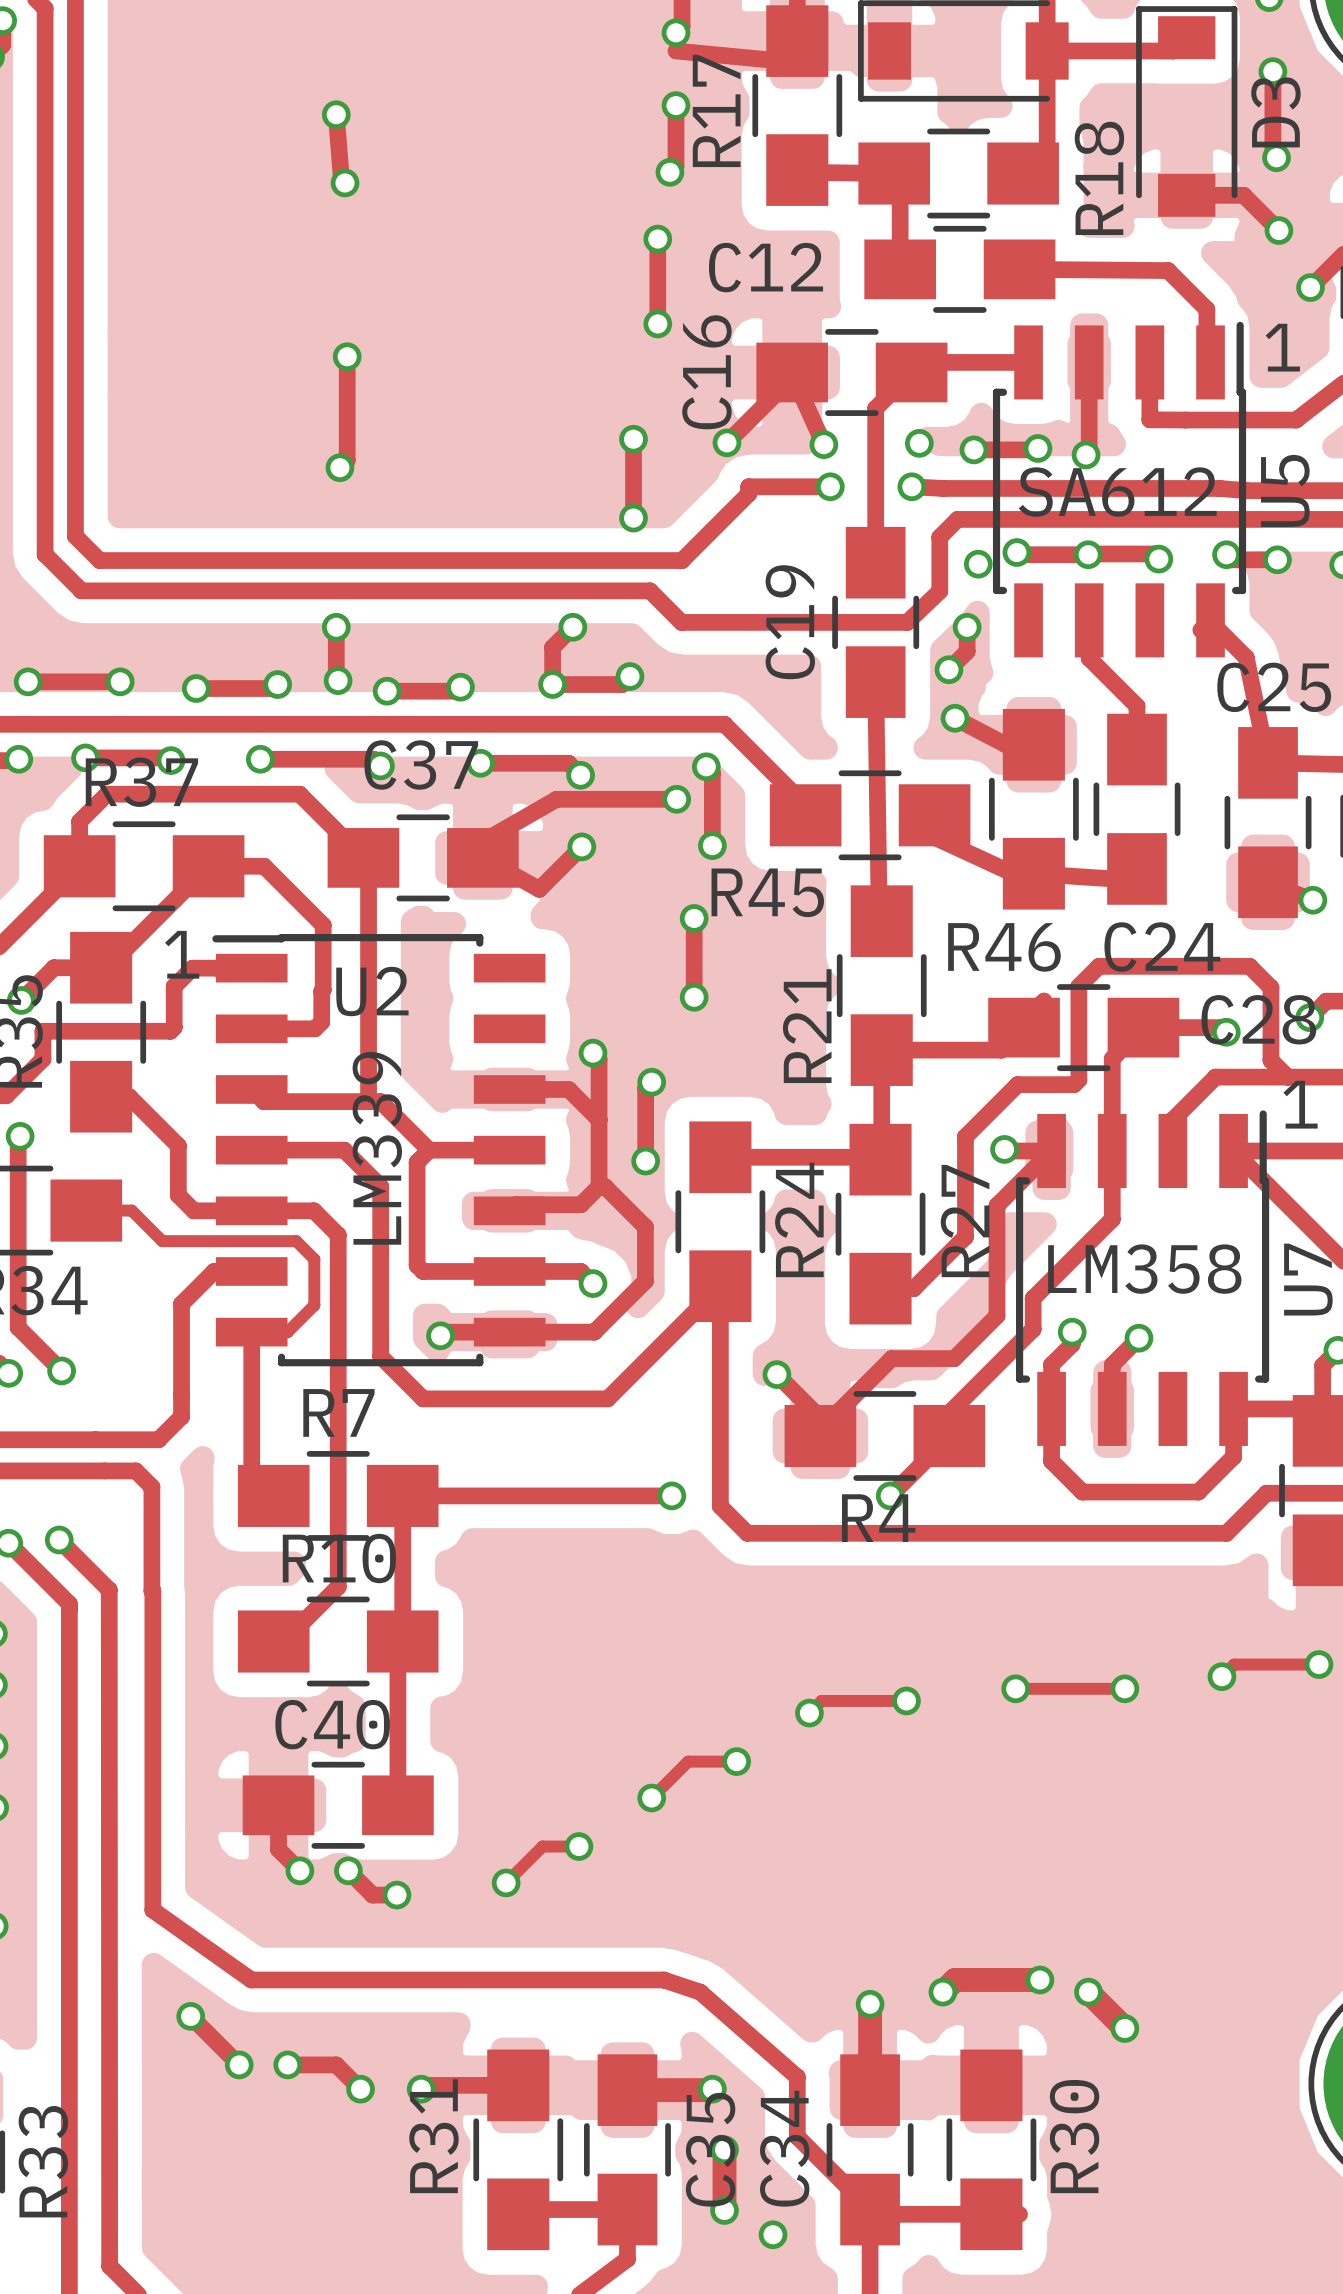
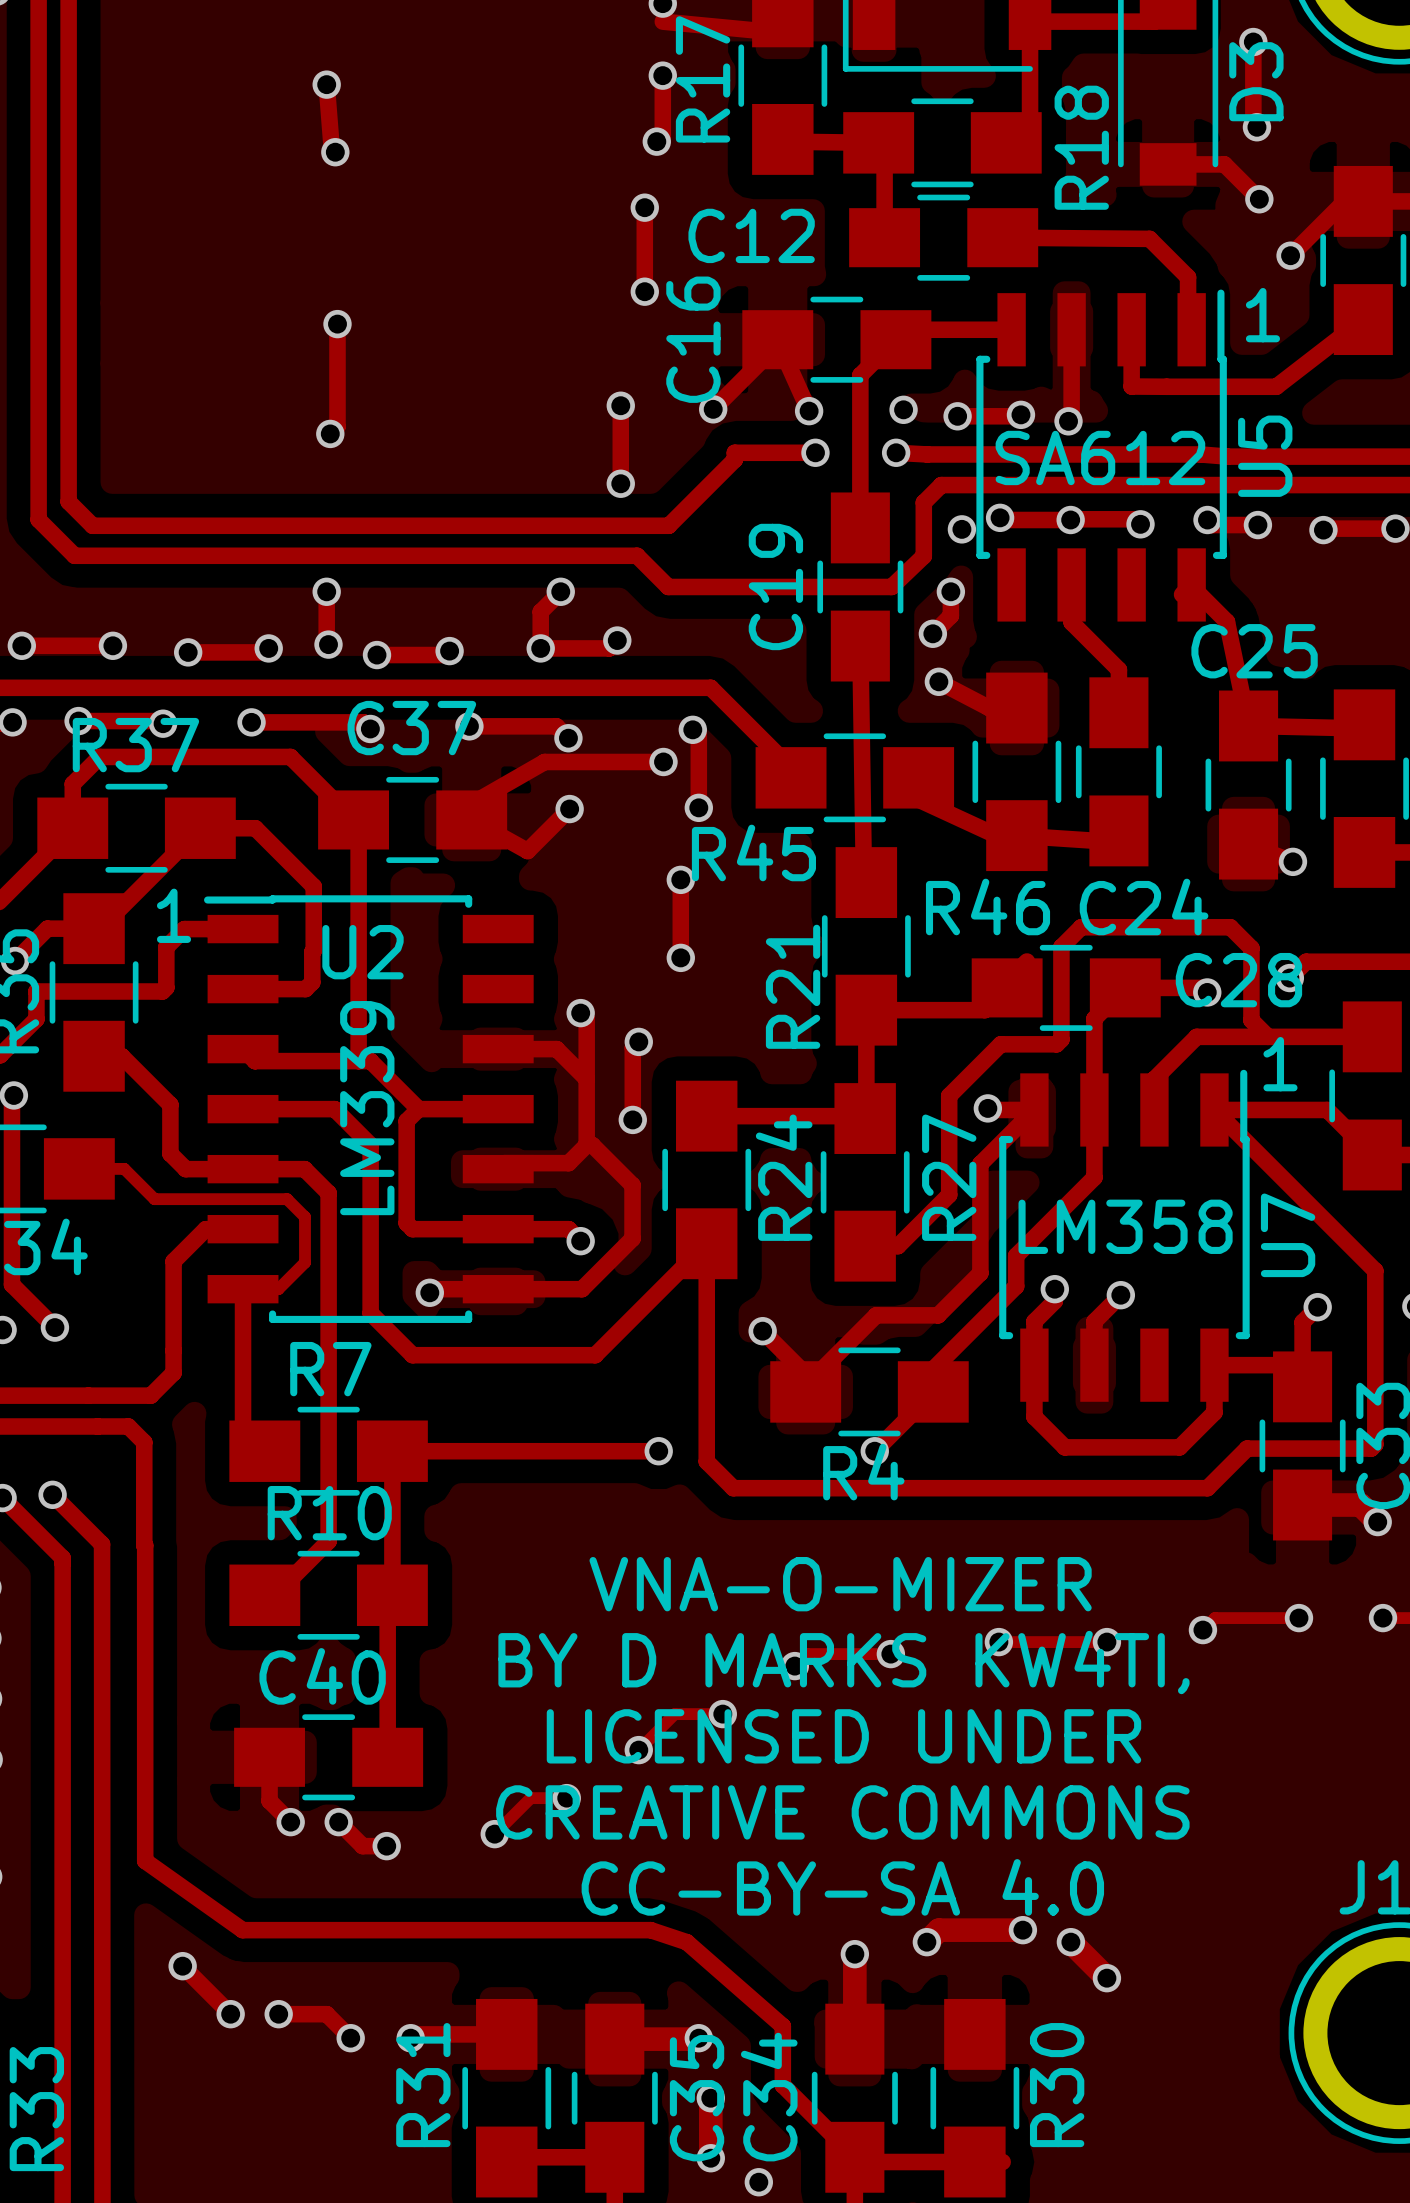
text: none -> VNA-O-MIZER (840, 1584)
text: none -> BY D MARKS KW4TI, (843, 1662)
text: none -> LICENSED UNDER (843, 1736)
text: none -> CREATIVE COMMONS (842, 1812)
text: none -> CC-BY-SA 4.0 (842, 1887)

